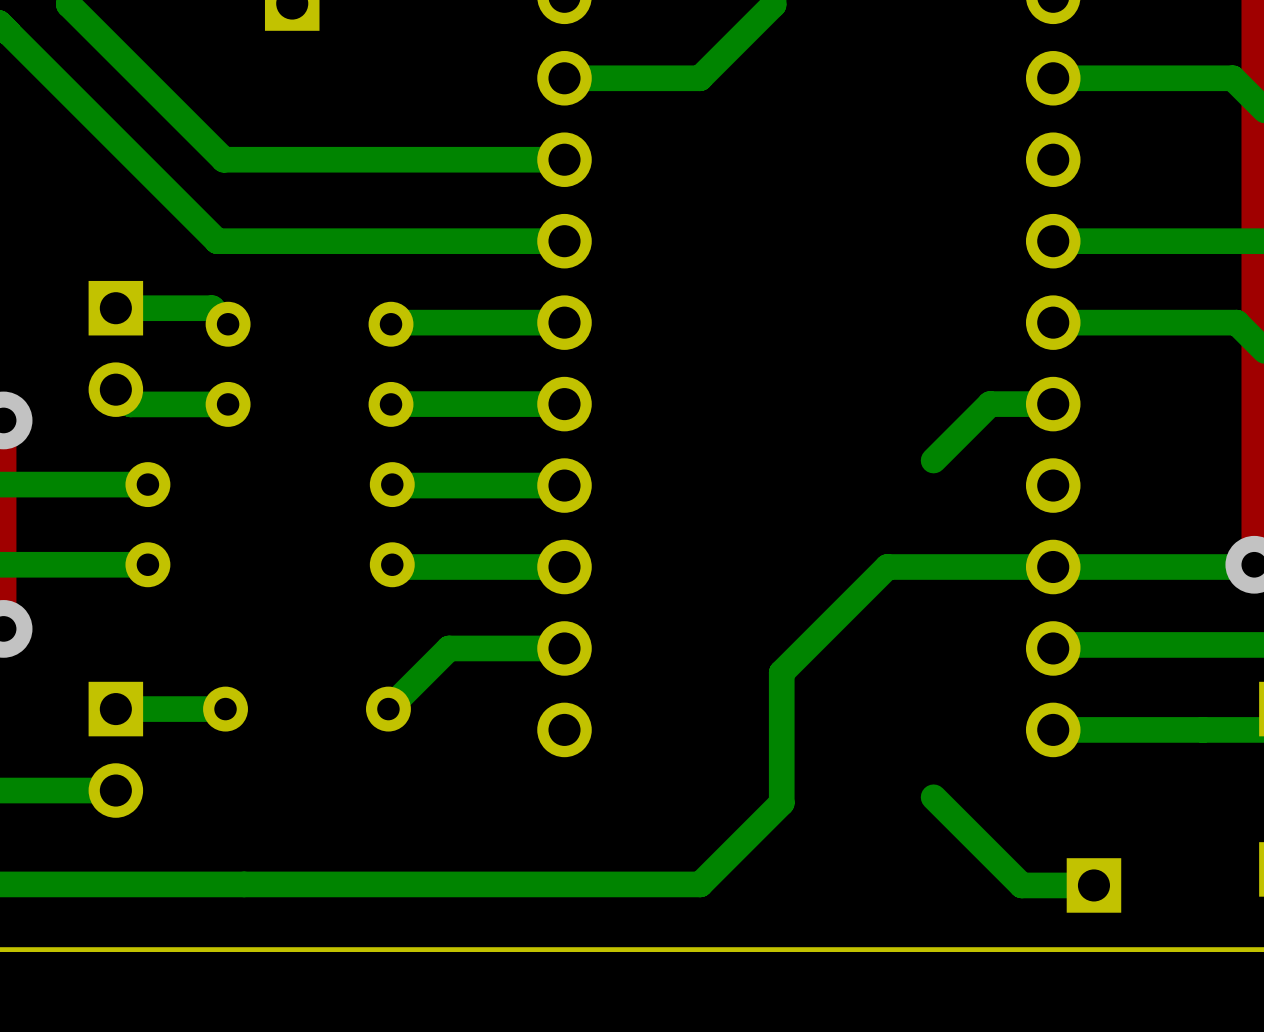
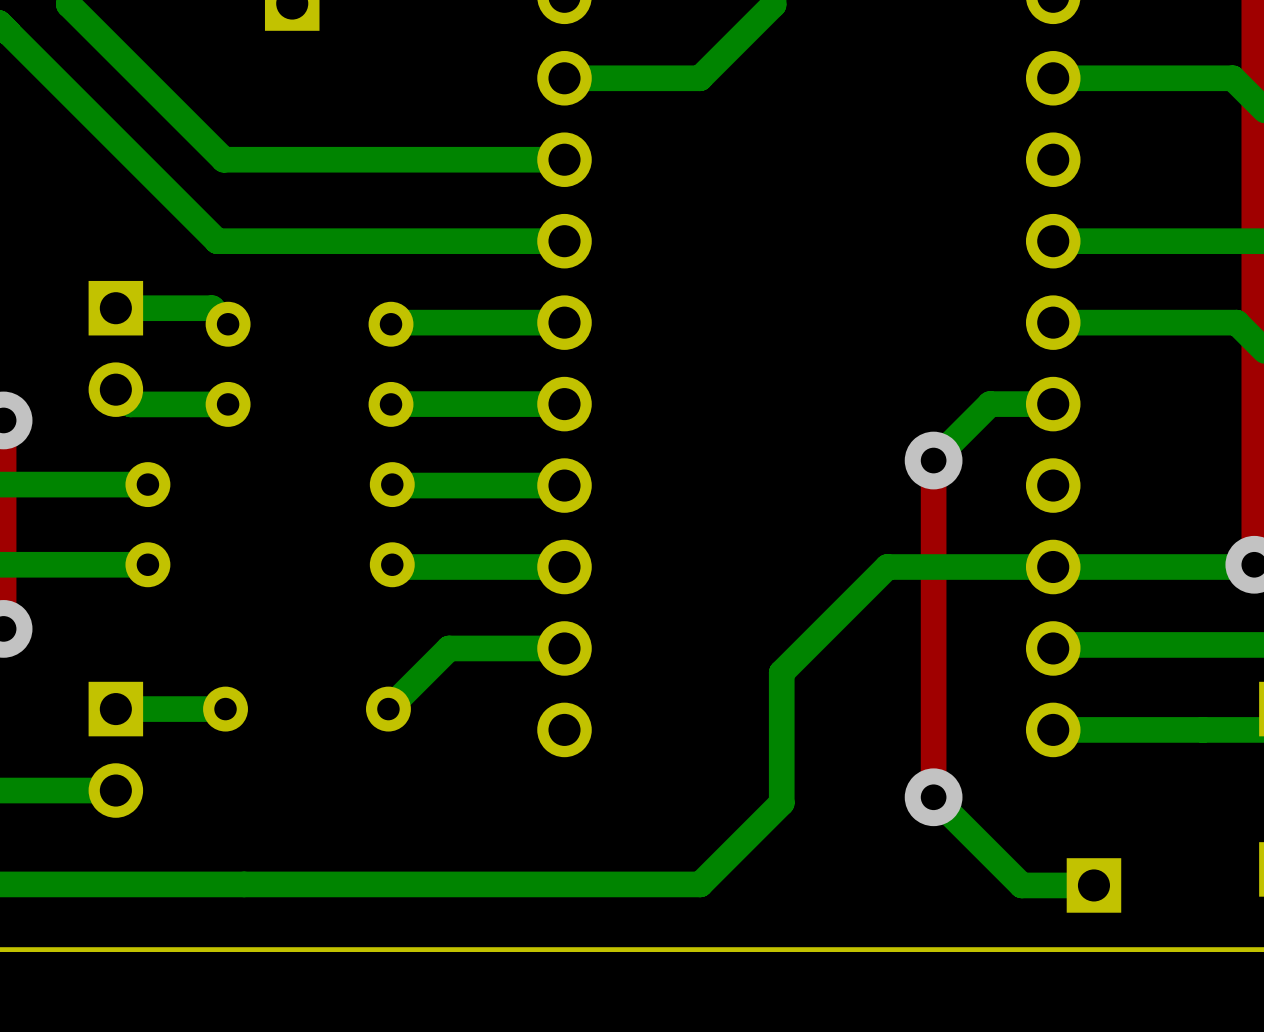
top track: none -> (933, 460) (933, 797)
via: none -> (933, 460)
via: none -> (933, 797)

